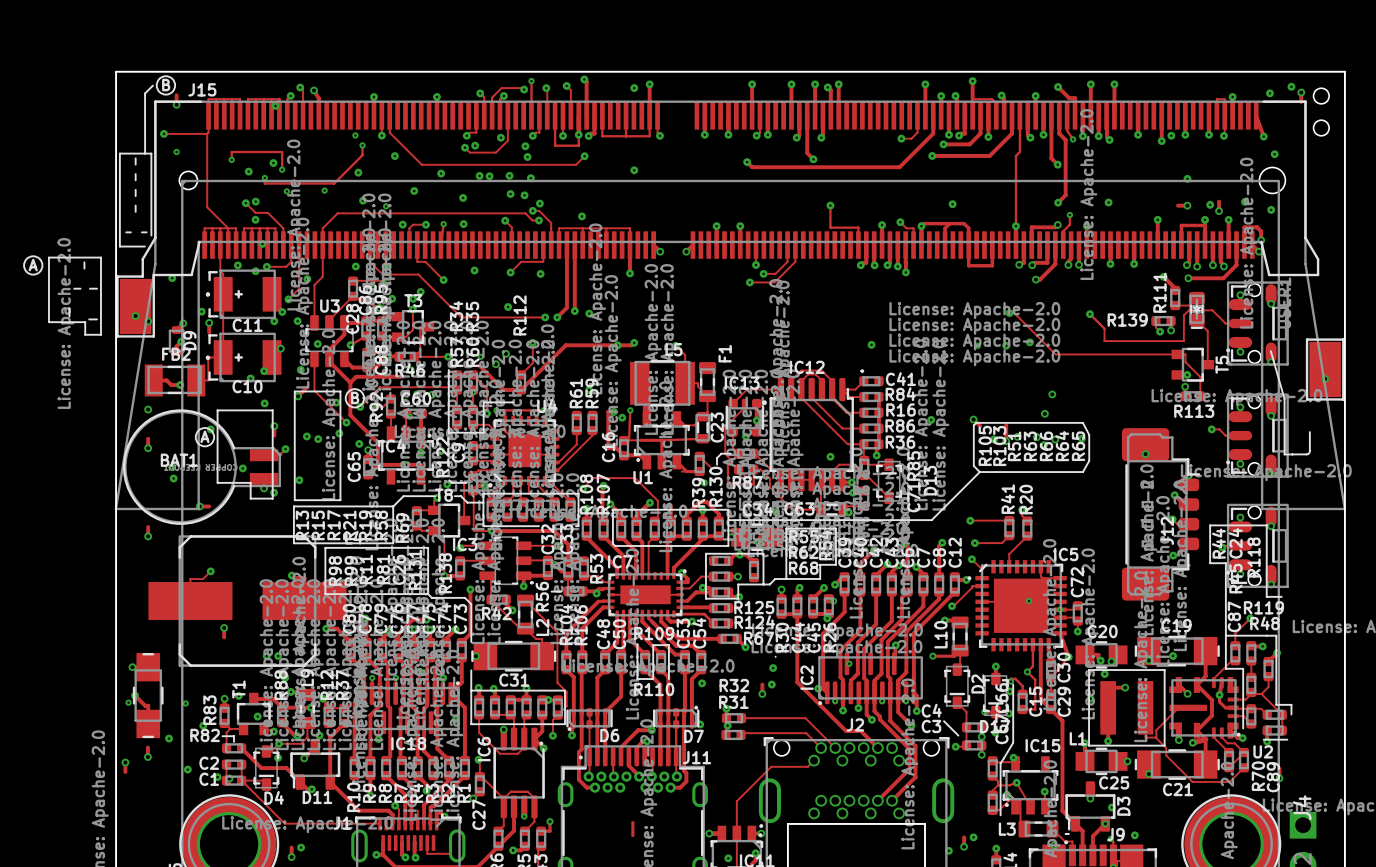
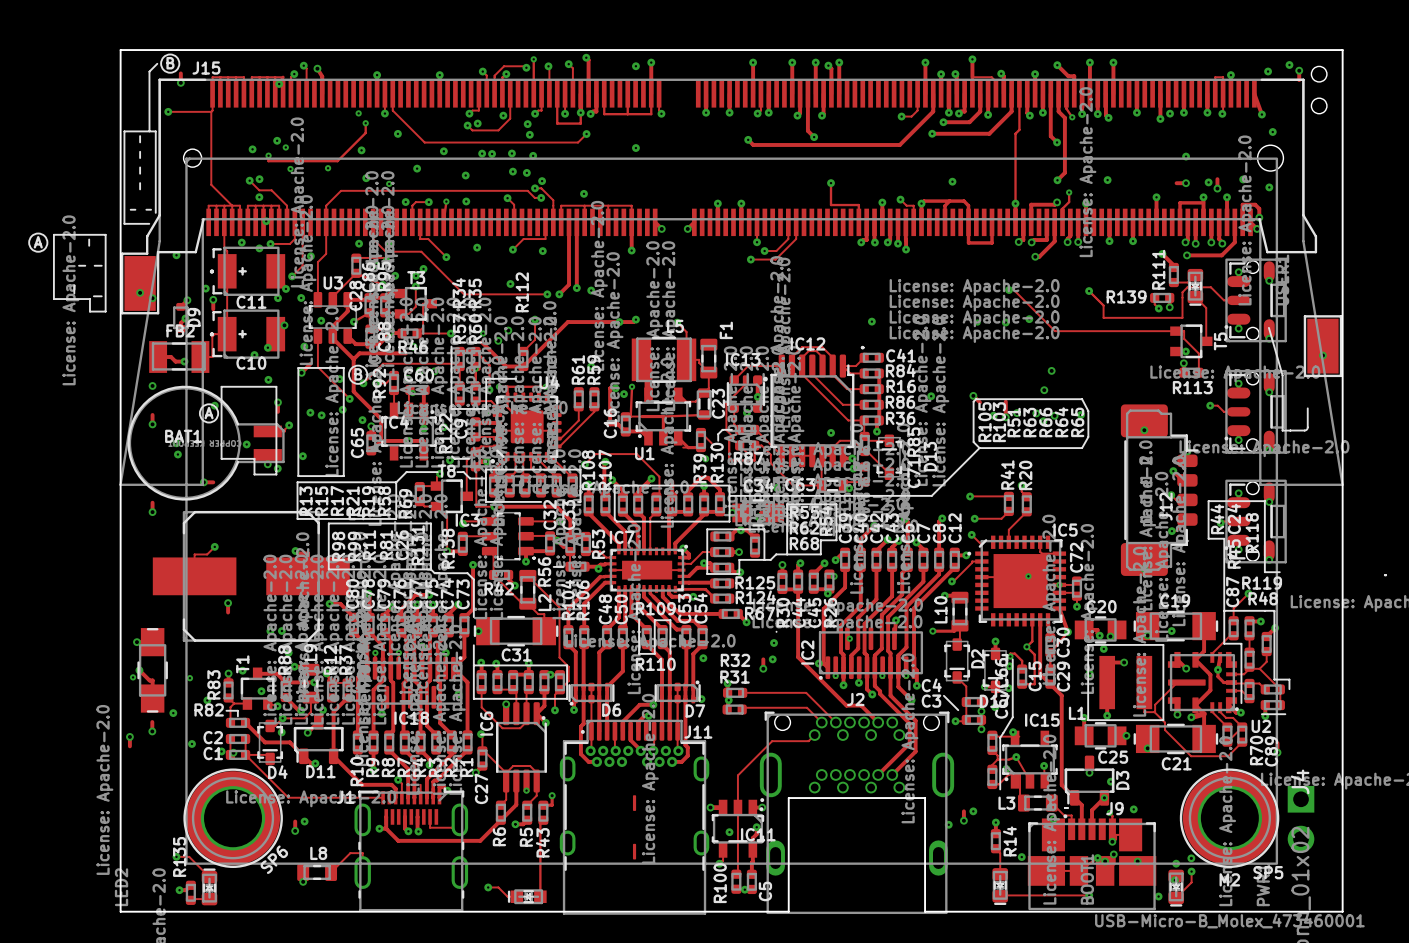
via: (176, 152) -> none
track: (231, 159) (231, 152) (282, 152) (282, 169) -> none
via: (231, 159) -> none

